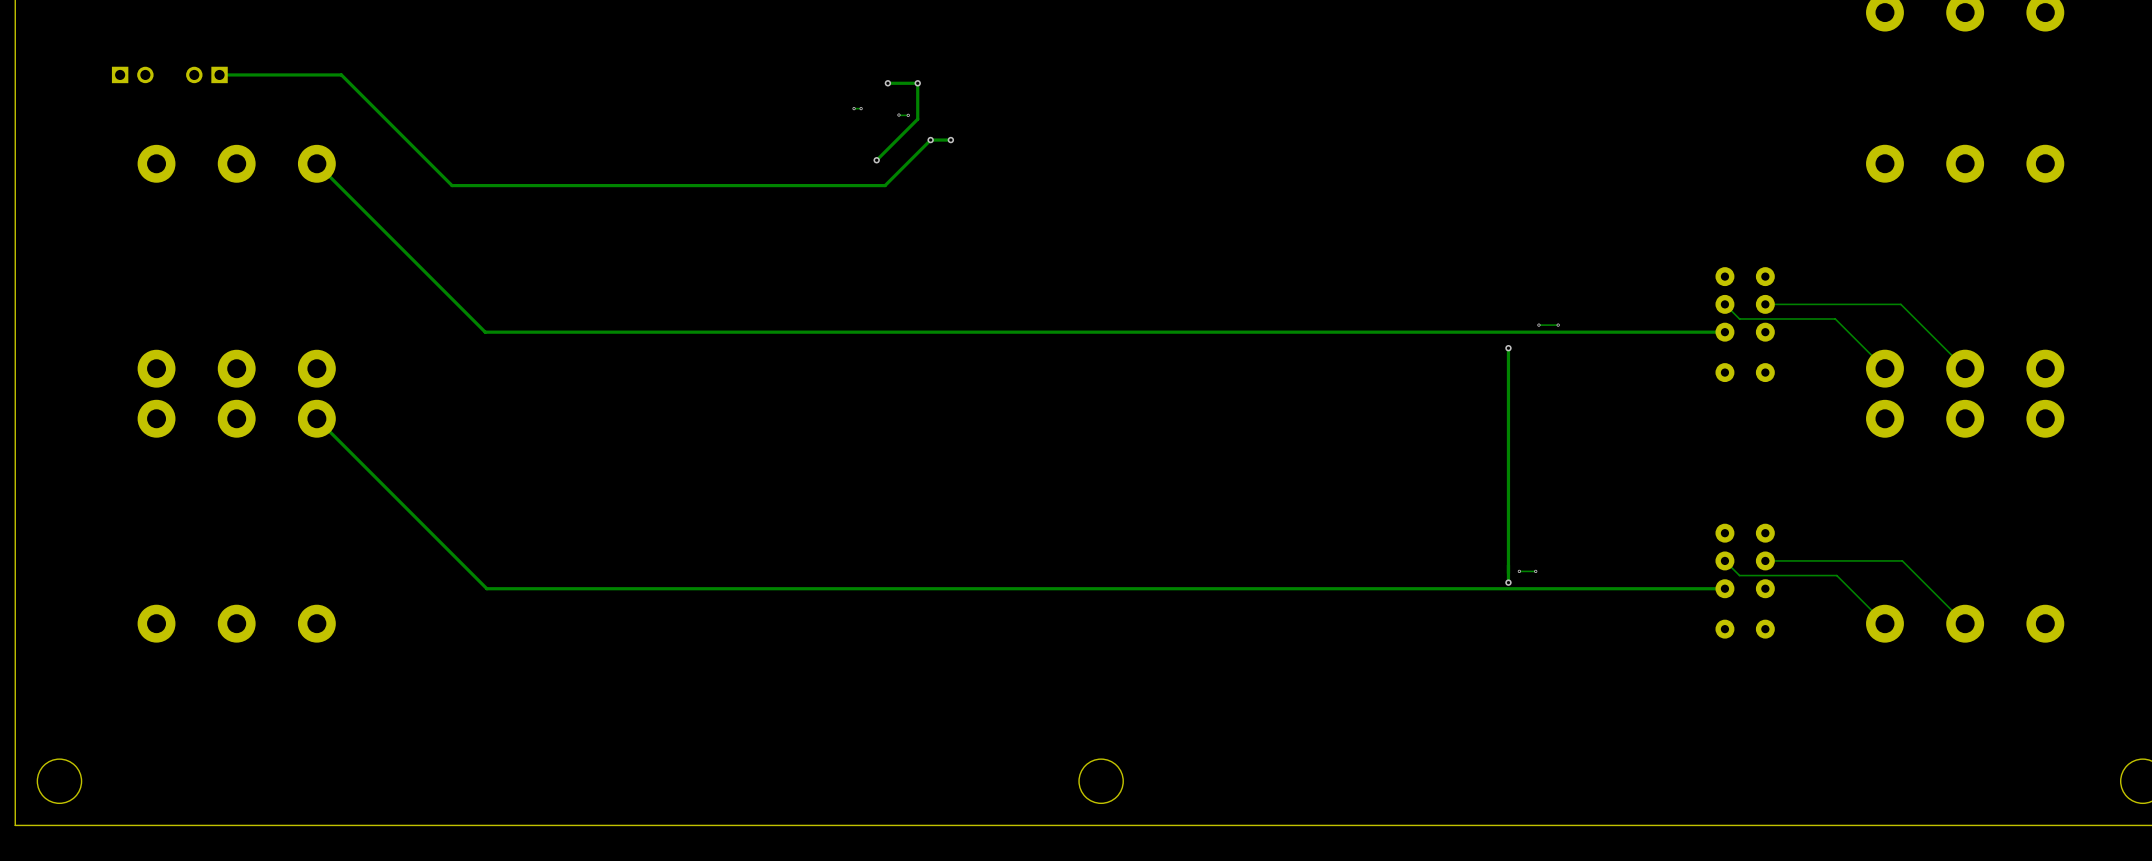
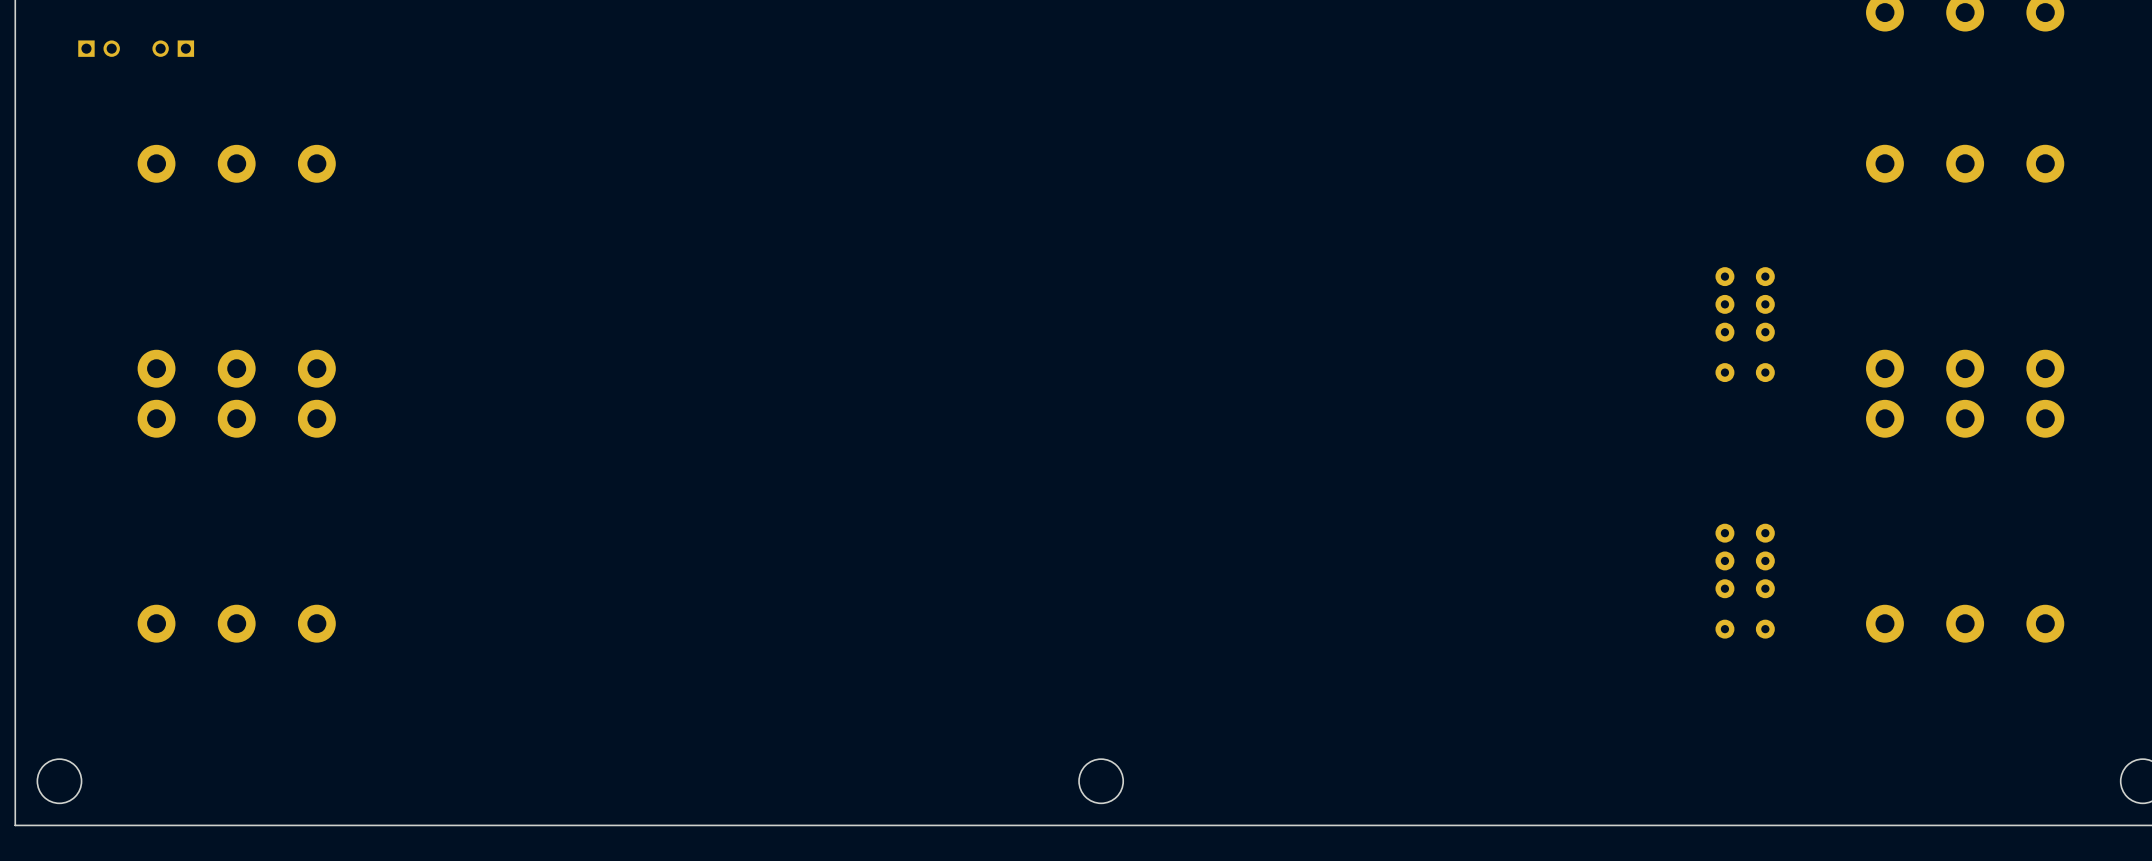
part: none -> (99, 48)
part: none -> (173, 48)
part: (132, 74) -> none
part: (206, 74) -> none
track: (219, 74) (341, 74) (452, 185) (885, 185) (930, 140) (950, 140) -> none
track: (887, 83) (917, 83) (917, 119) (876, 160) -> none
via: (887, 83) -> none
via: (917, 83) -> none
via: (854, 108) -> none
track: (861, 108) (854, 108) -> none
via: (861, 108) -> none
track: (898, 115) (908, 115) -> none
via: (898, 115) -> none
via: (908, 115) -> none
via: (930, 140) -> none
via: (950, 140) -> none
via: (876, 160) -> none
track: (316, 163) (485, 332) (1724, 332) -> none
track: (1724, 304) (1739, 319) (1835, 319) (1884, 368) -> none
track: (1765, 304) (1900, 304) (1965, 368) -> none
via: (1538, 325) -> none
track: (1558, 325) (1538, 325) -> none
via: (1558, 325) -> none
track: (1508, 348) (1508, 582) -> none
via: (1508, 348) -> none
track: (316, 418) (486, 588) (1724, 588) -> none
track: (1724, 560) (1739, 575) (1836, 575) (1884, 623) -> none
track: (1765, 560) (1902, 560) (1965, 623) -> none
via: (1519, 571) -> none
track: (1535, 571) (1519, 571) -> none
via: (1535, 571) -> none
via: (1508, 582) -> none

